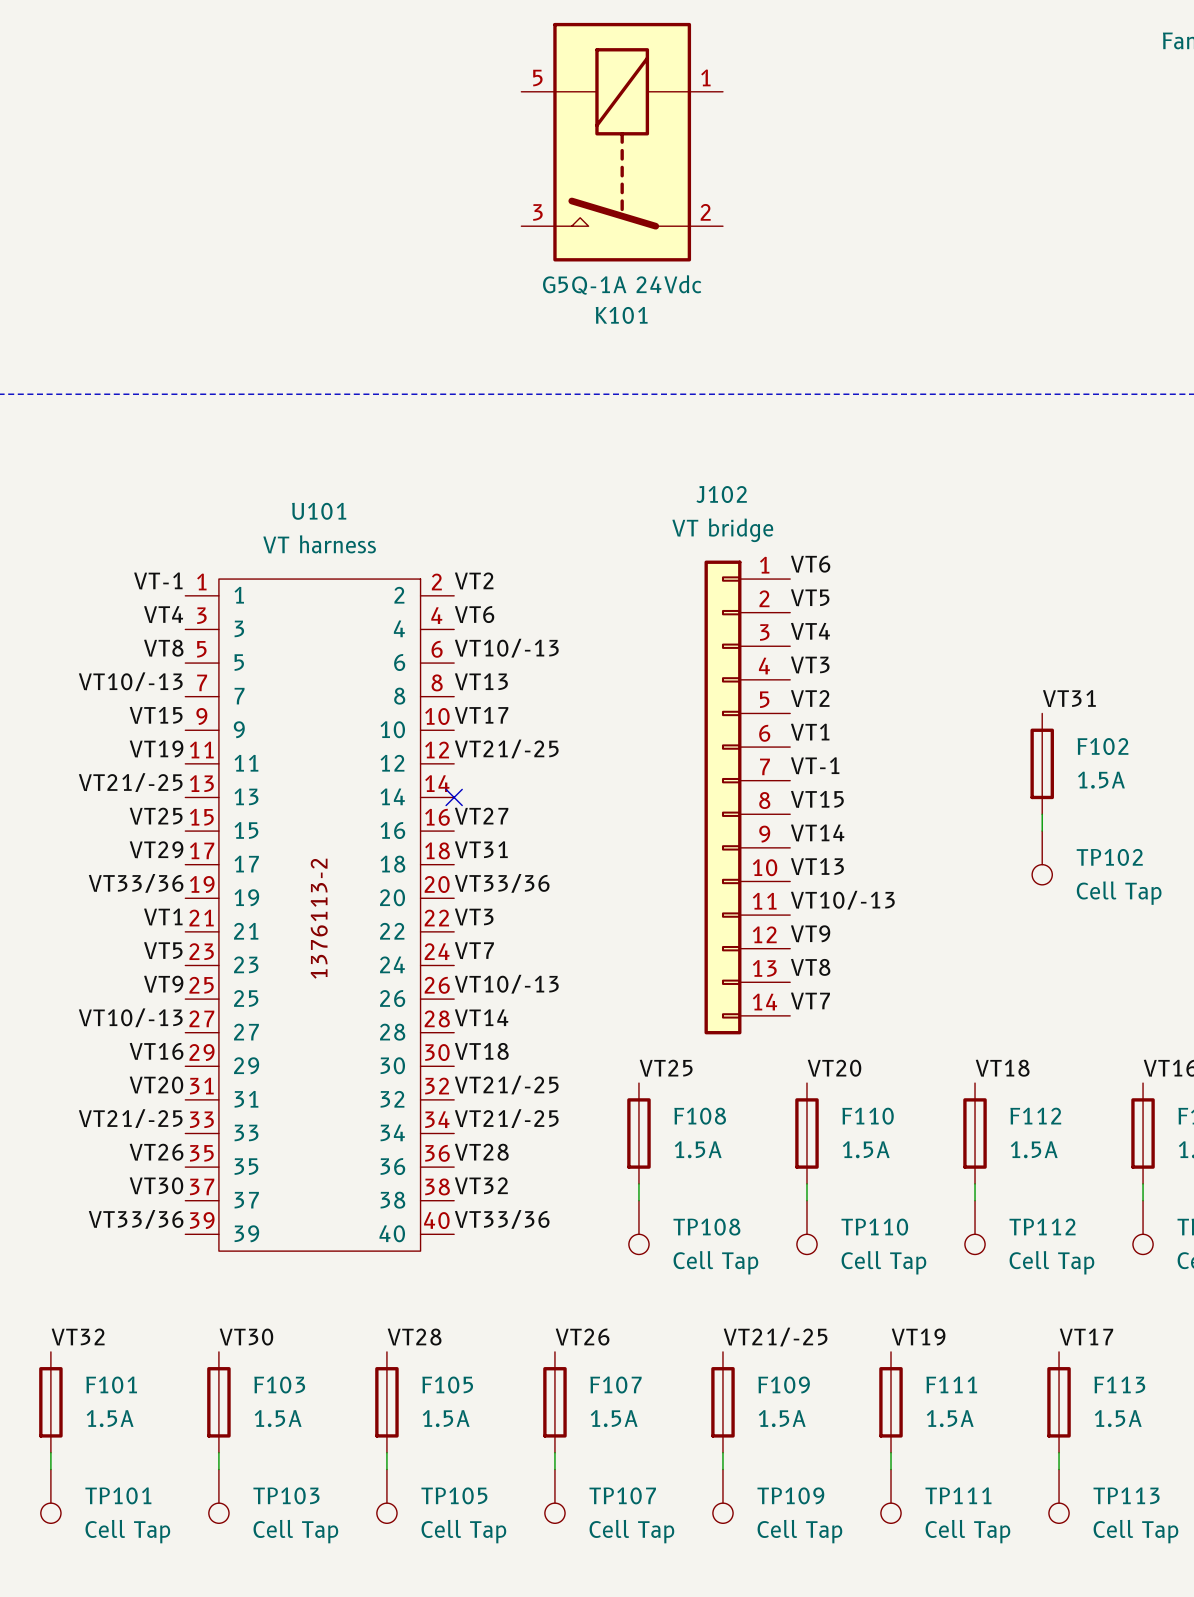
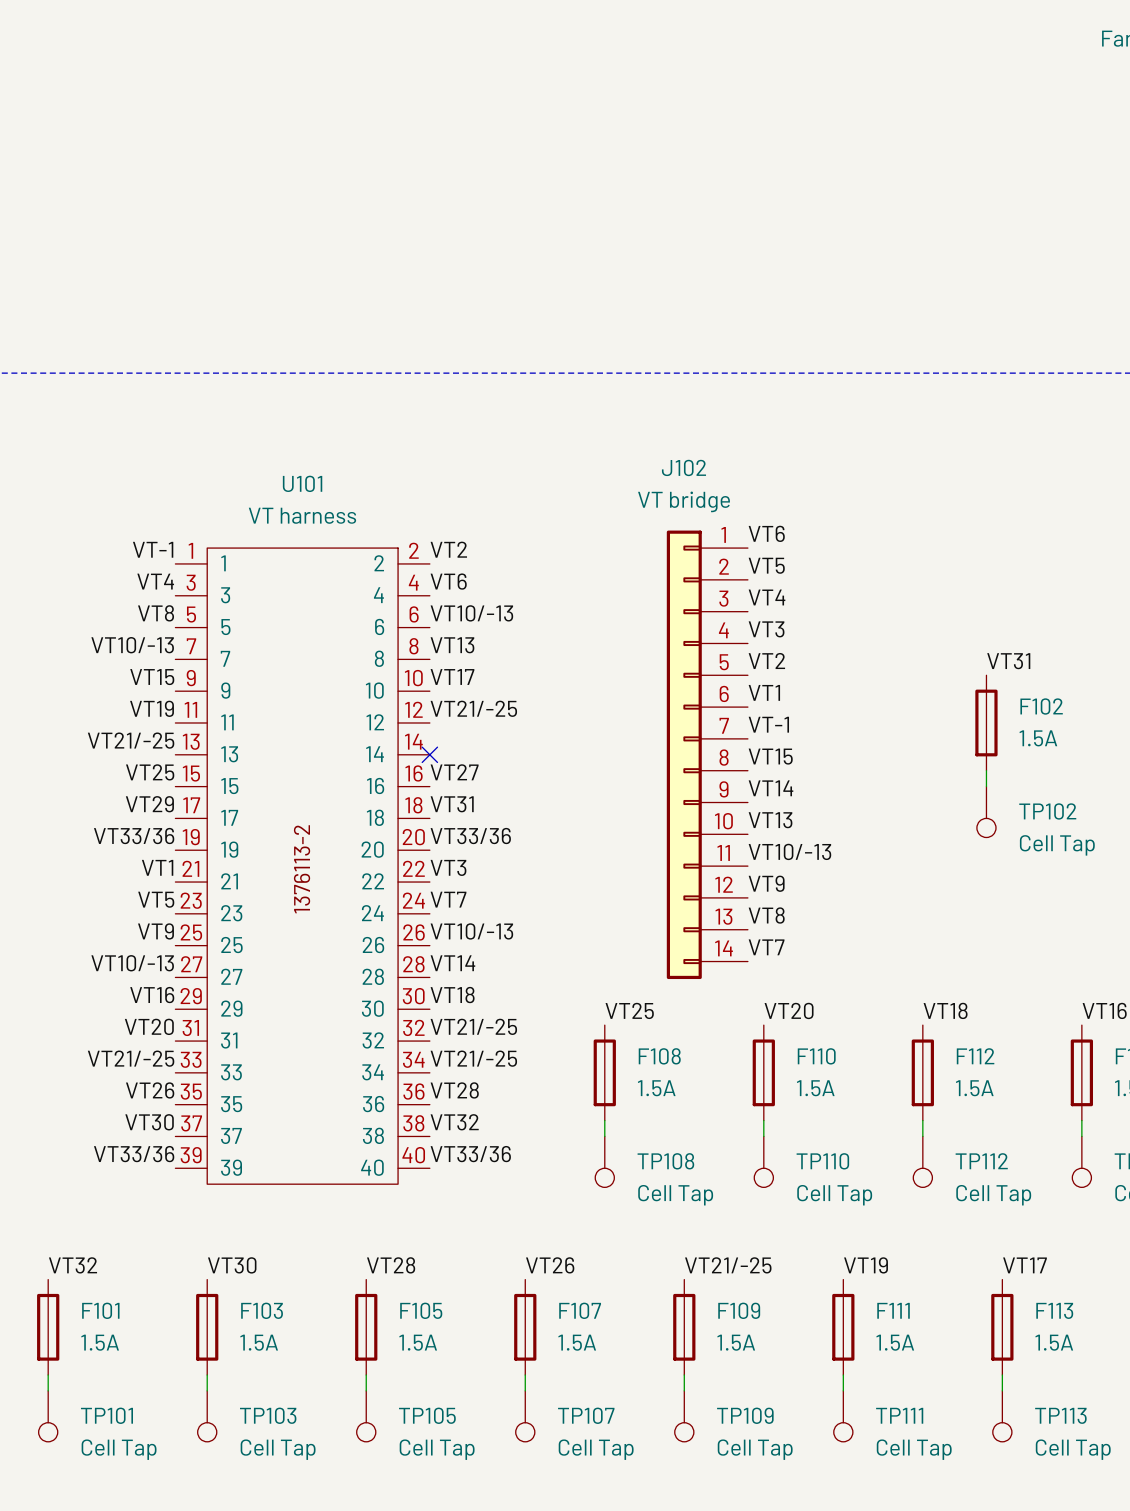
K101: G5Q-1A 24Vdc (622, 142) -> none

